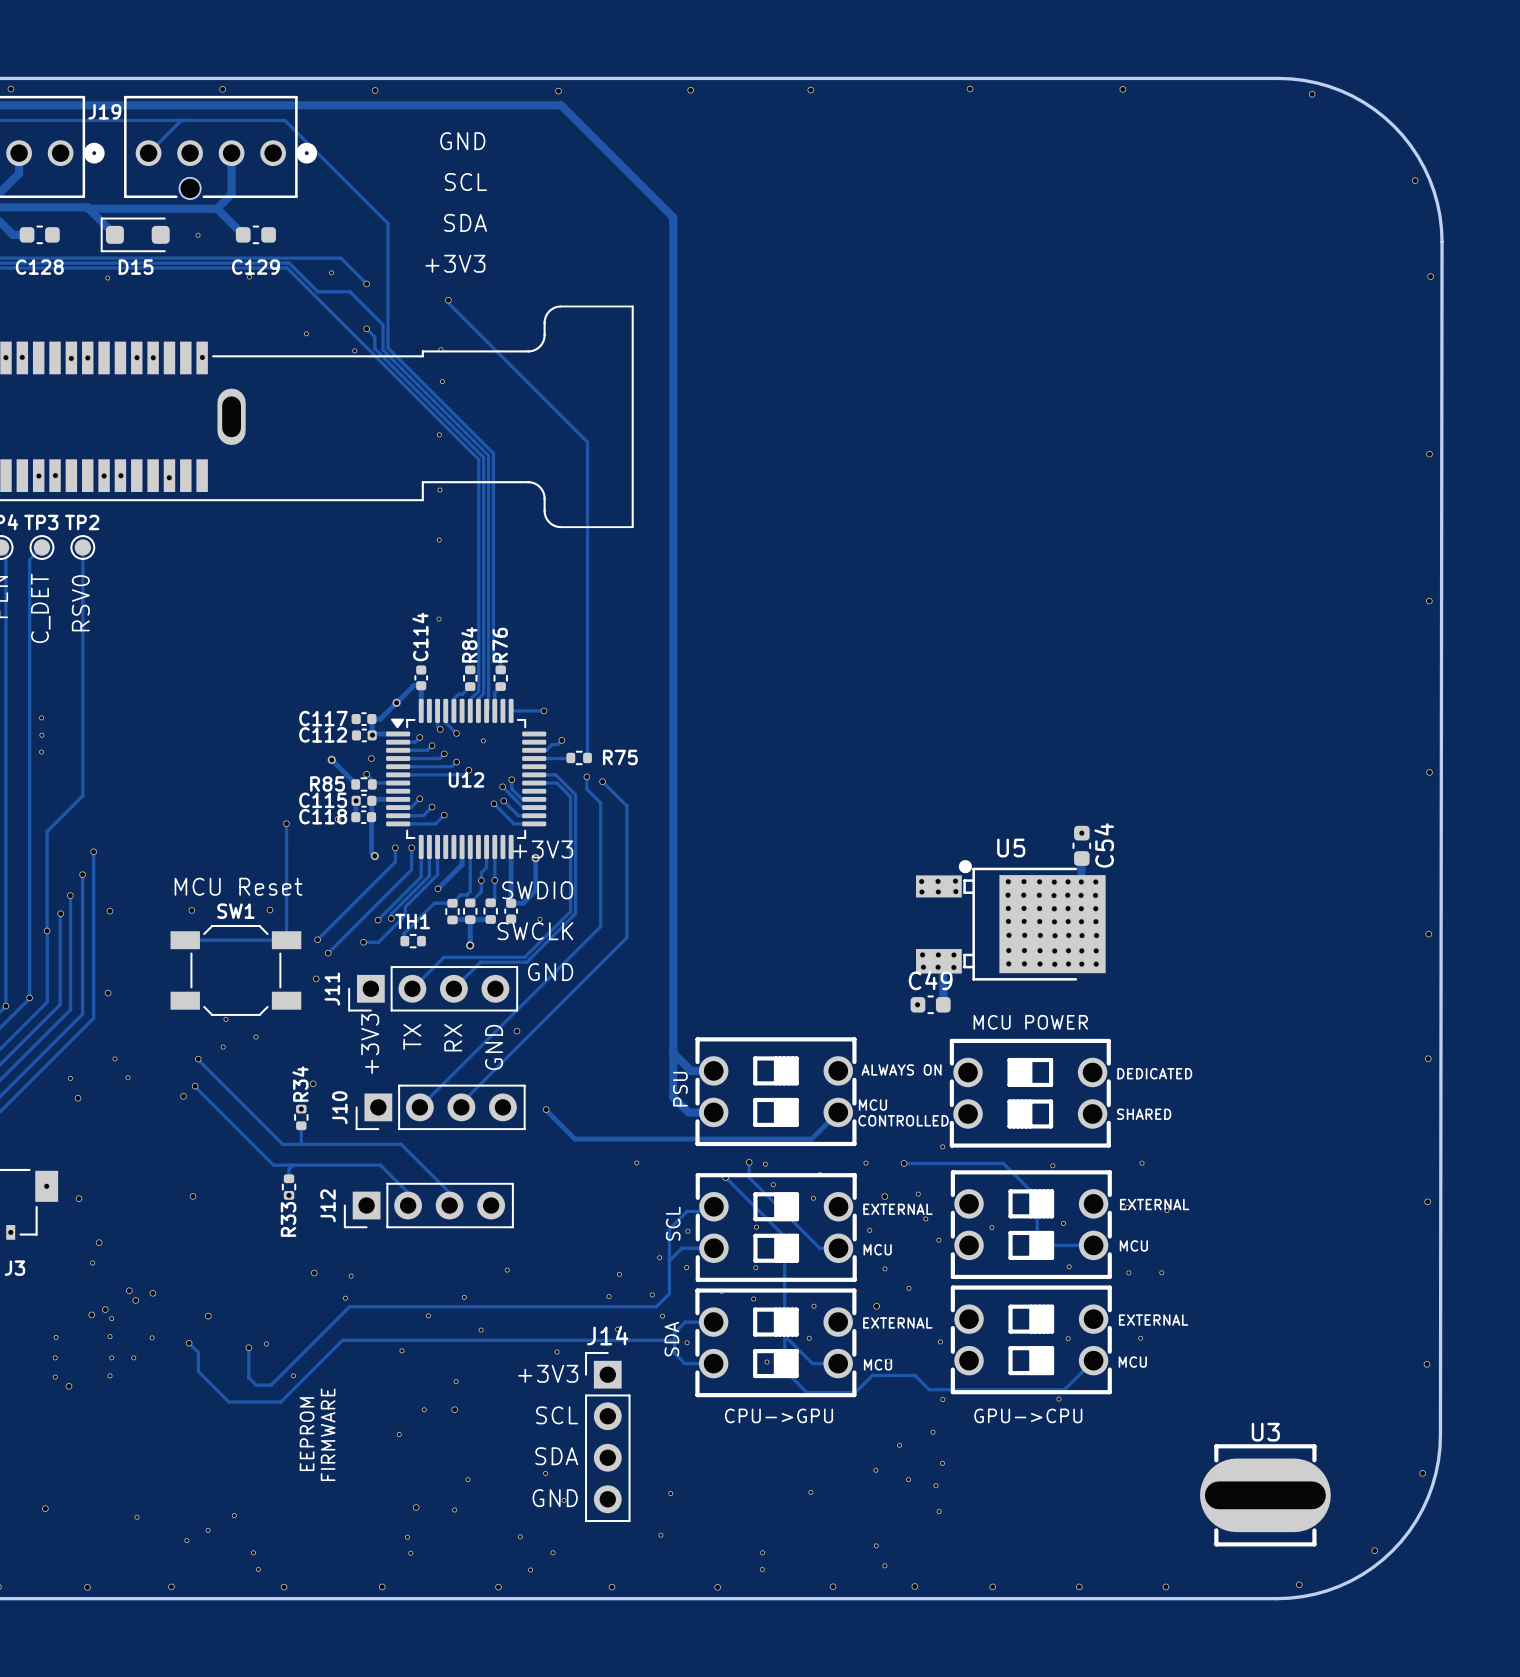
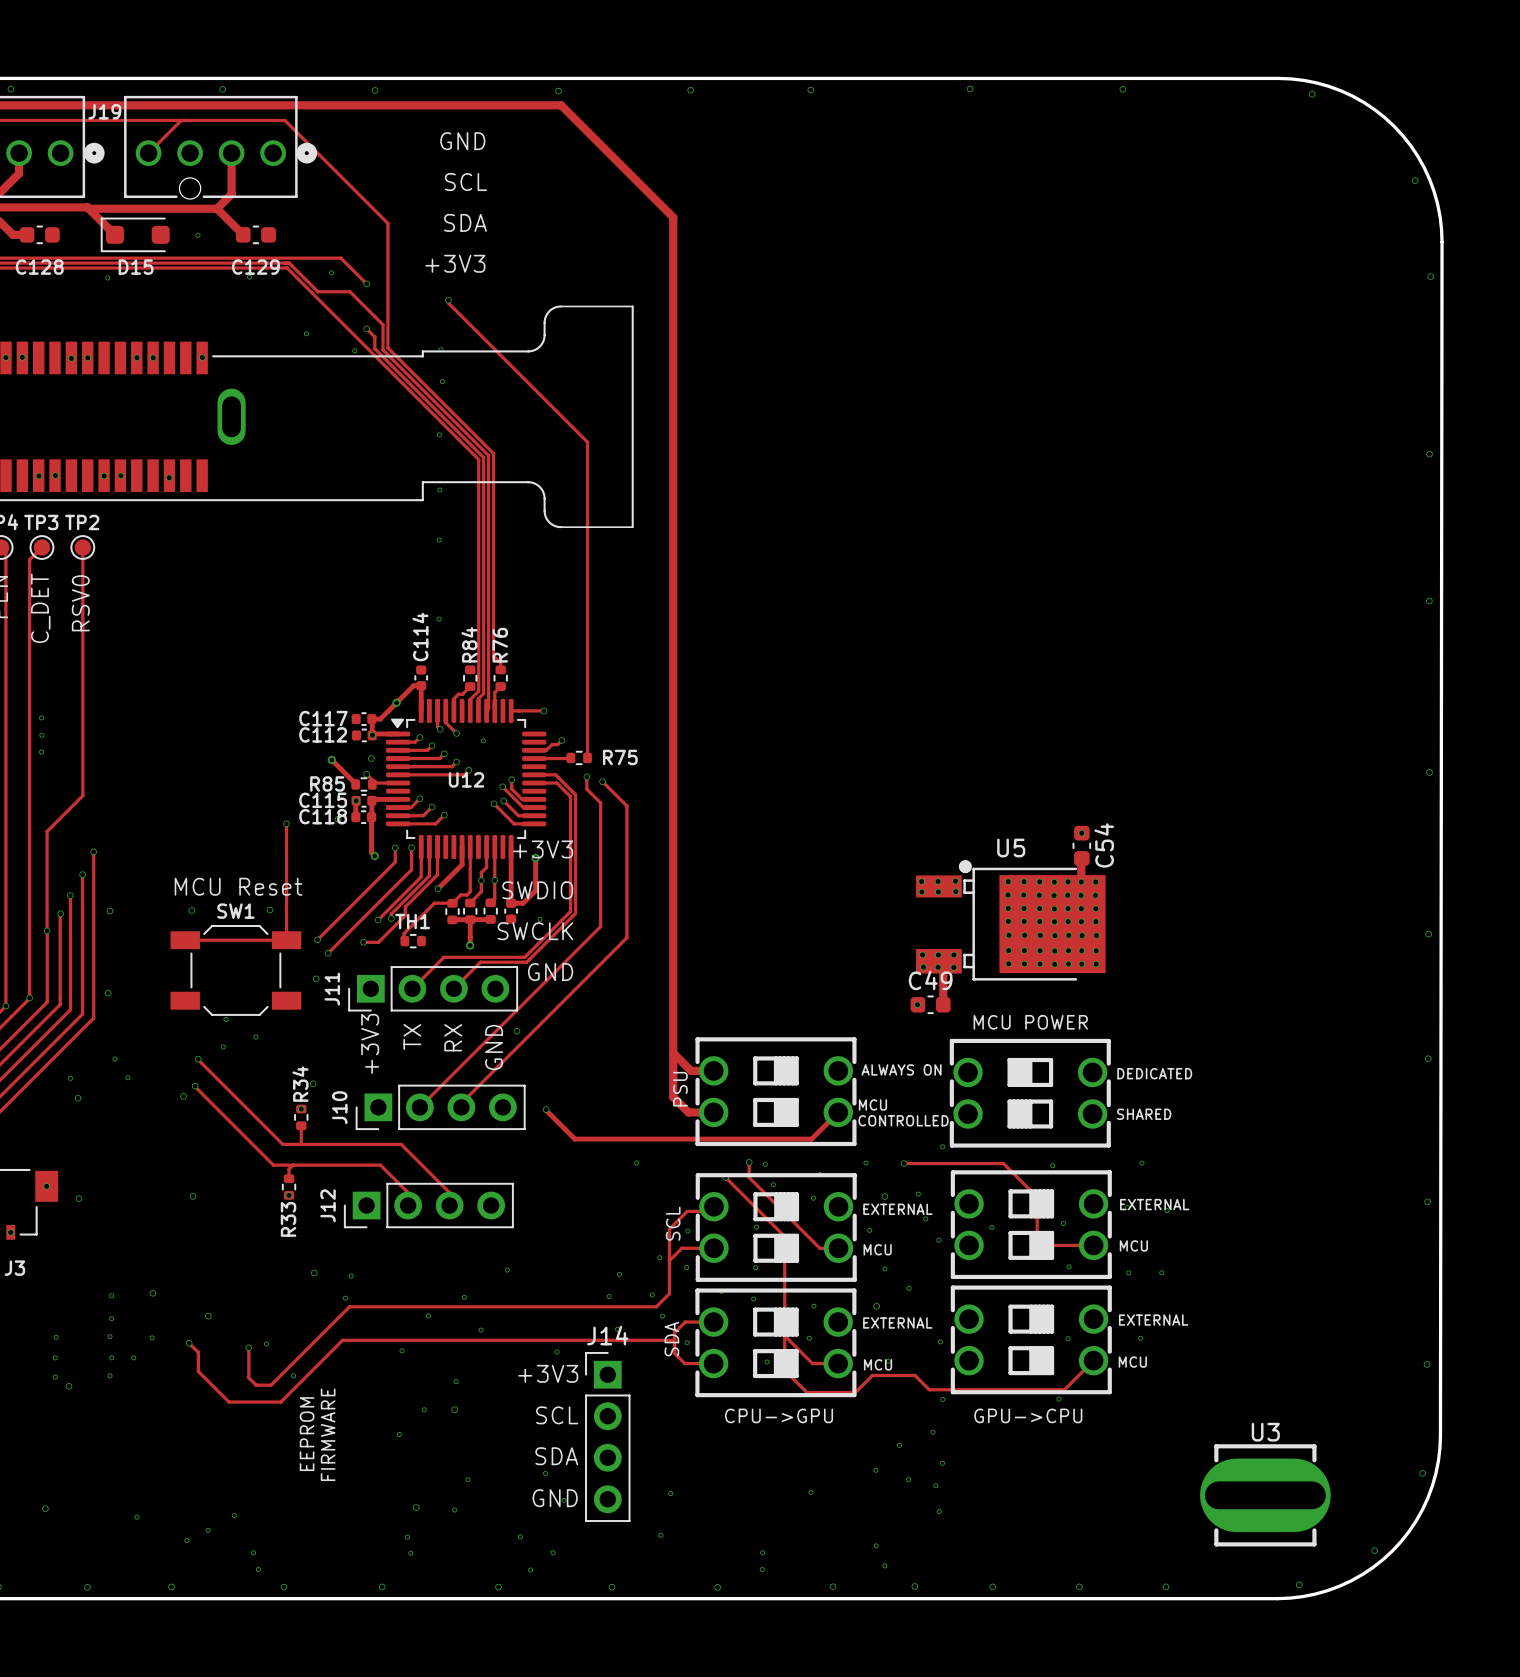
via: (99, 1242) -> none
via position: (92, 1262) -> (111, 1295)
via: (129, 1290) -> none
via: (135, 1300) -> none
via: (105, 1309) -> none
via: (91, 1314) -> none

